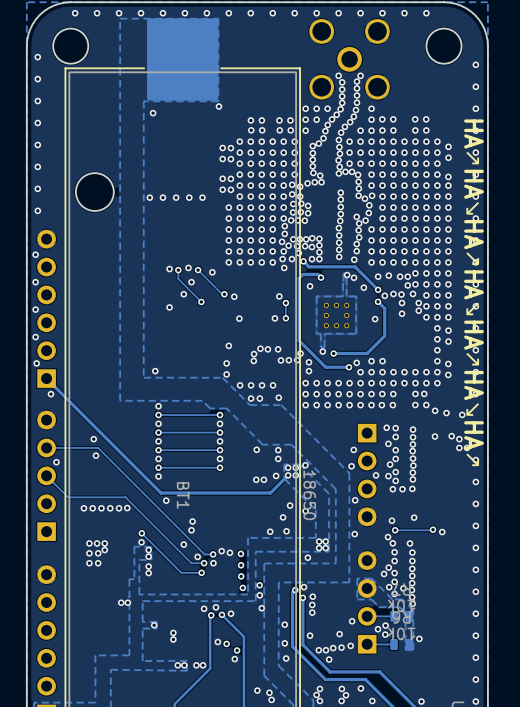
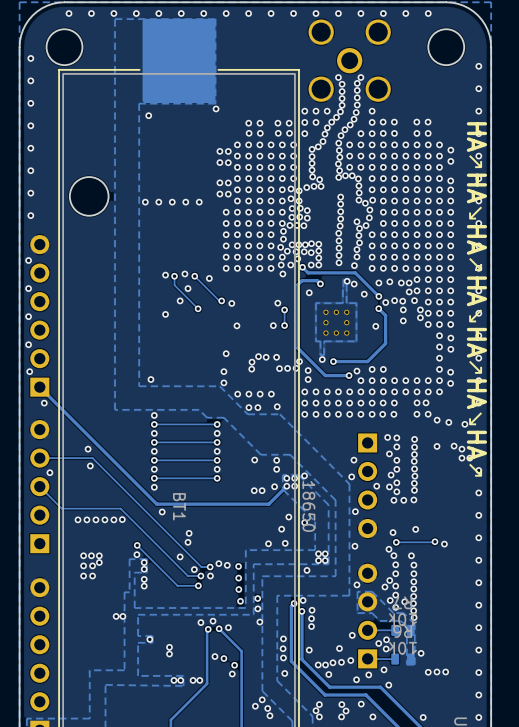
via: none -> (356, 584)
via: none -> (283, 648)
via: none -> (384, 669)
via: none -> (428, 672)
via: none -> (436, 672)
via: none -> (445, 672)
via: none -> (368, 674)
via: none -> (356, 679)
via: none -> (388, 685)
via: none -> (262, 699)

